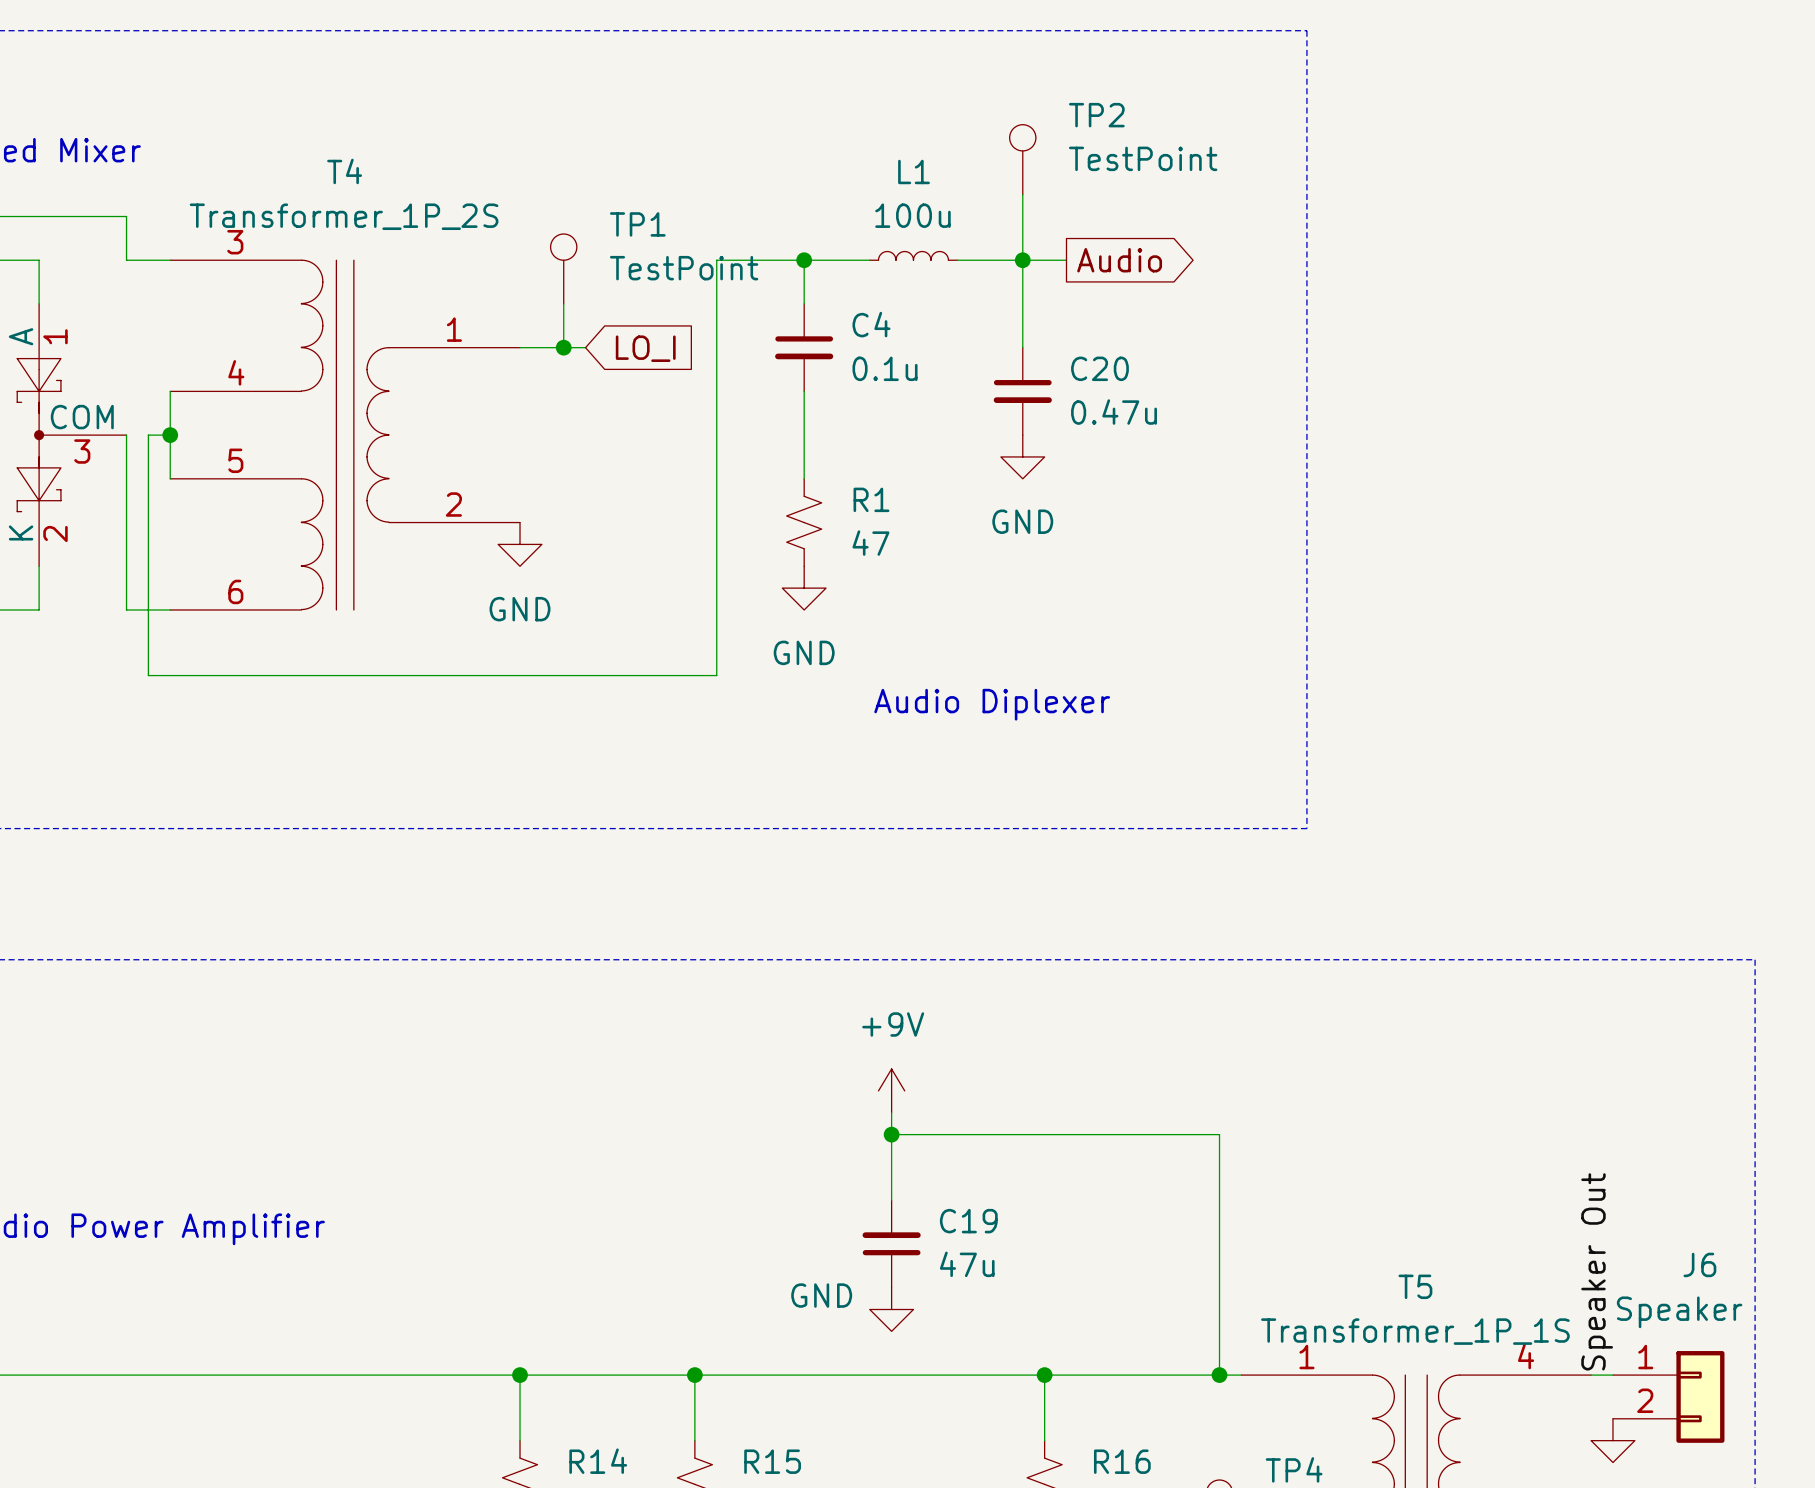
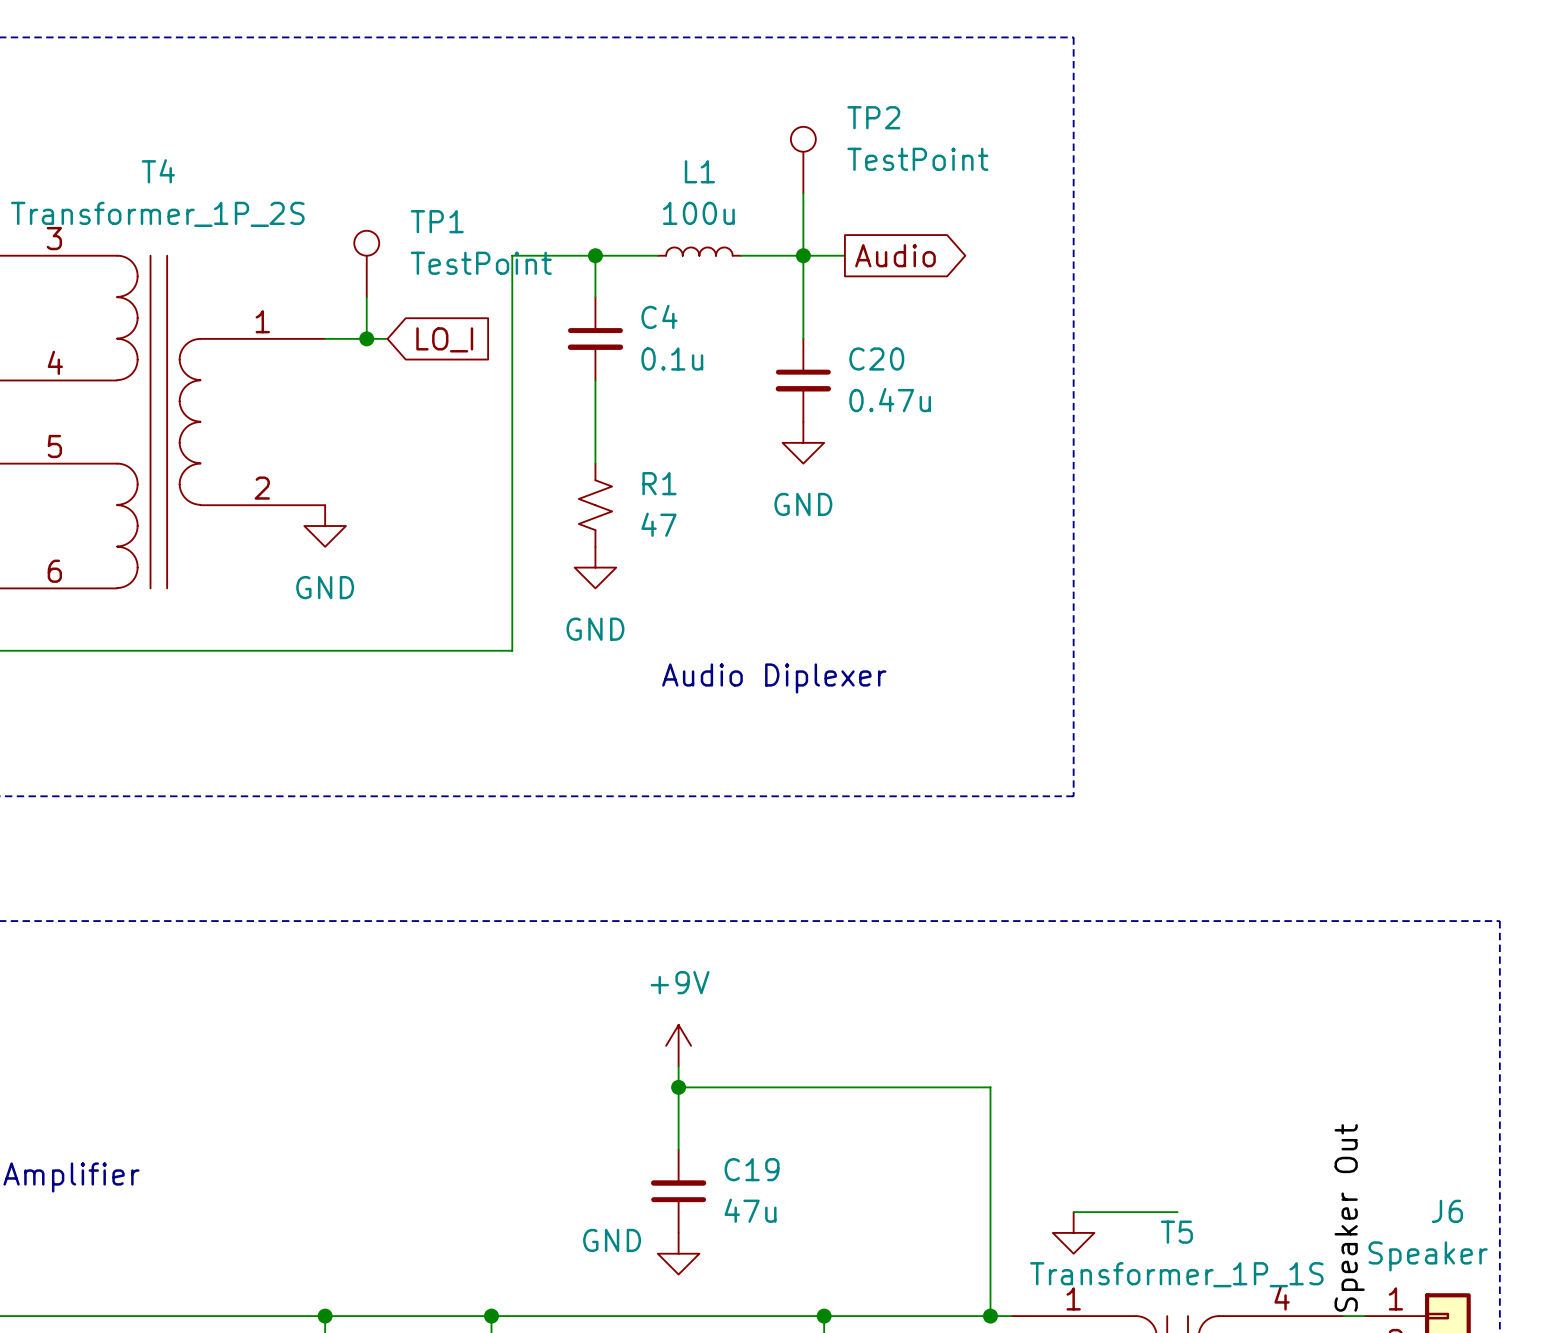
wire: none -> (1073, 1212) (1177, 1212)
power symbol: none -> (1073, 1232)

